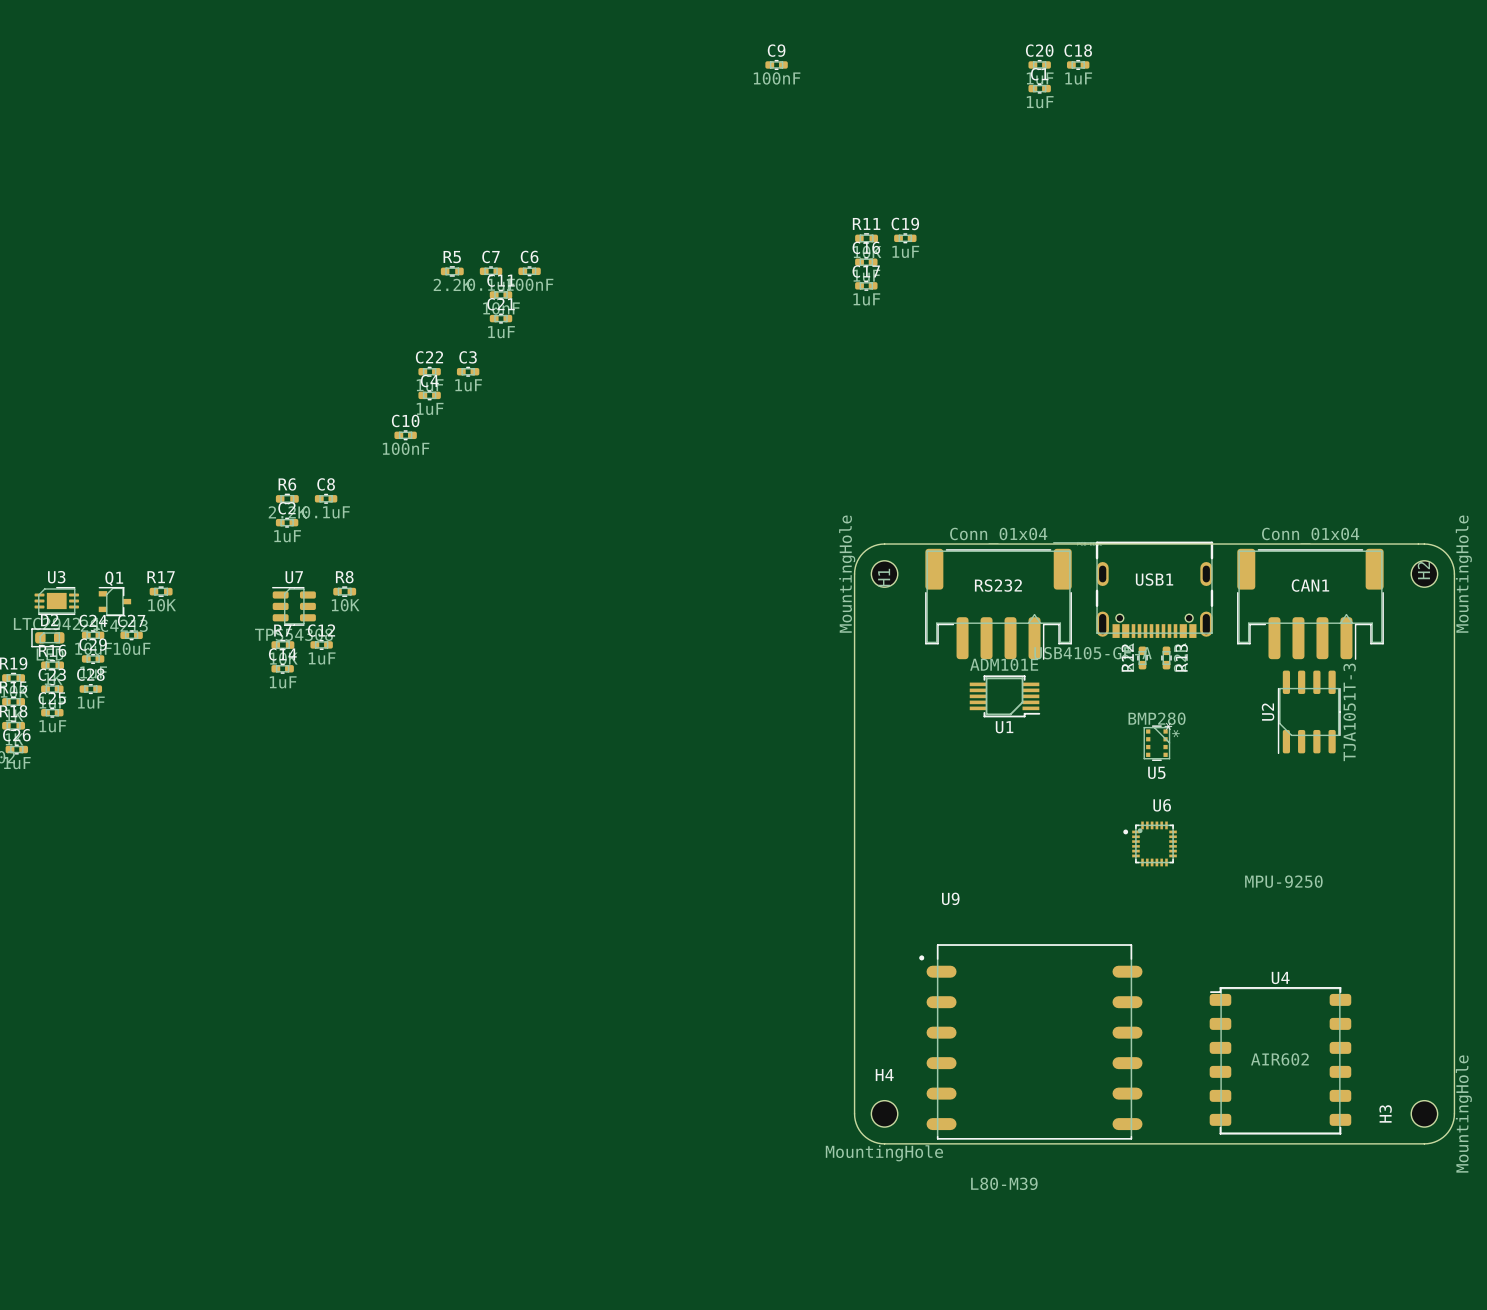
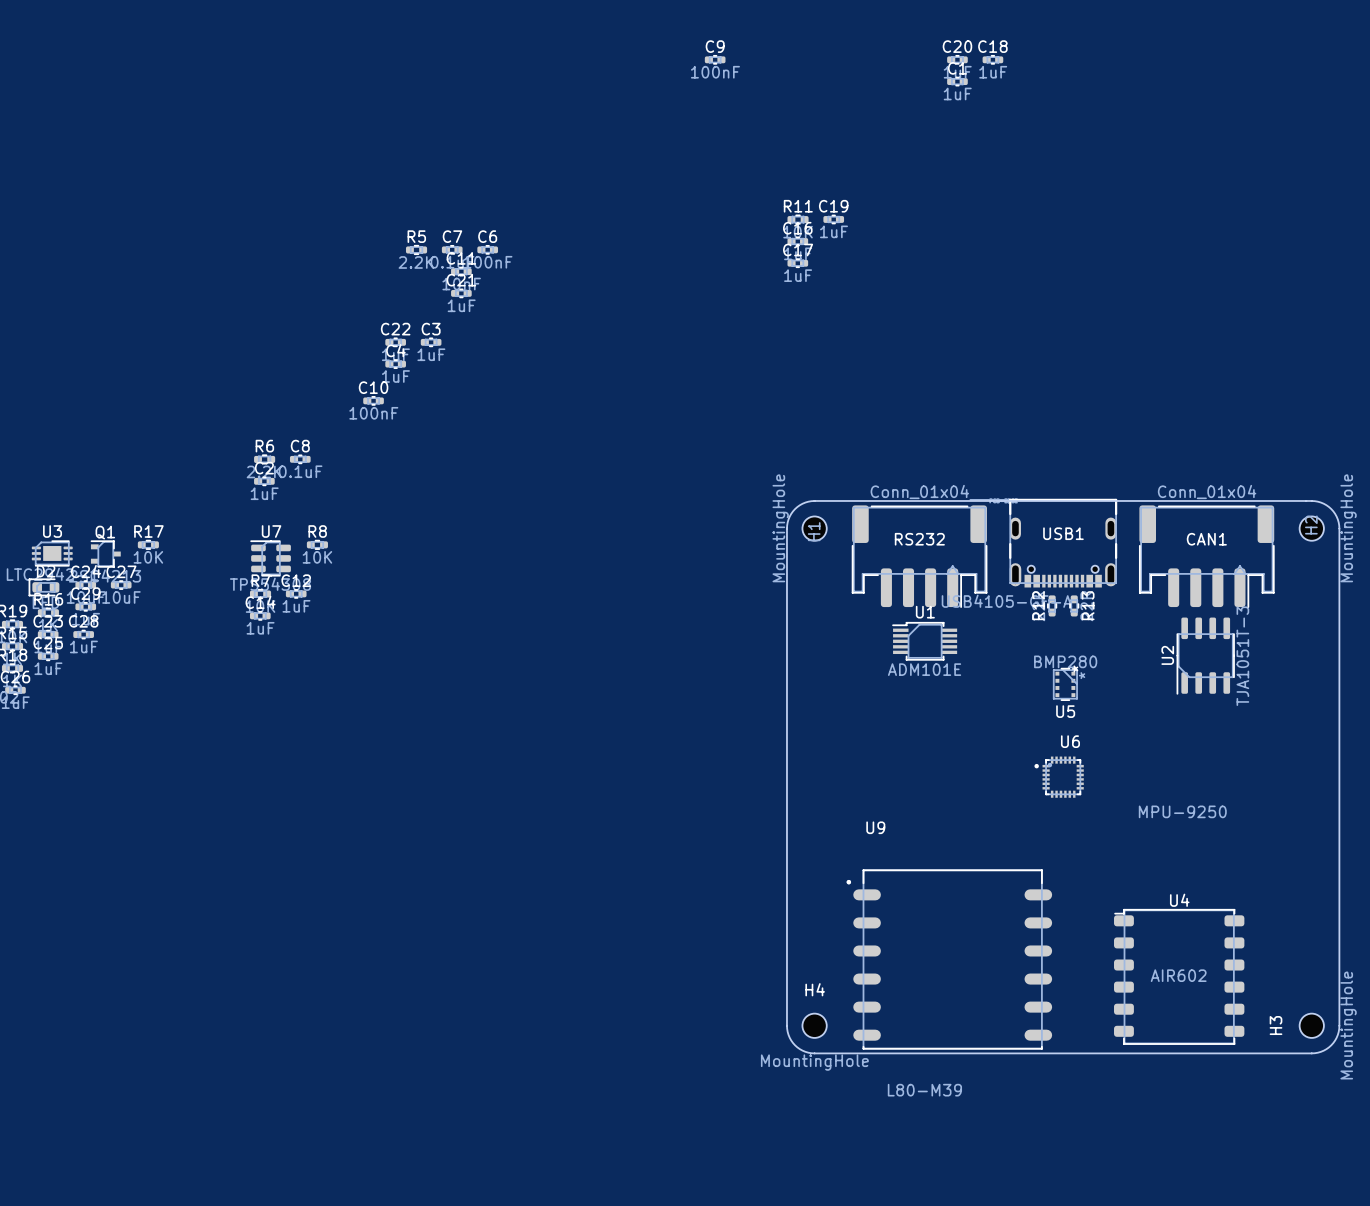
U1 rotation: 0° (1004, 696) -> 180° (924, 641)

